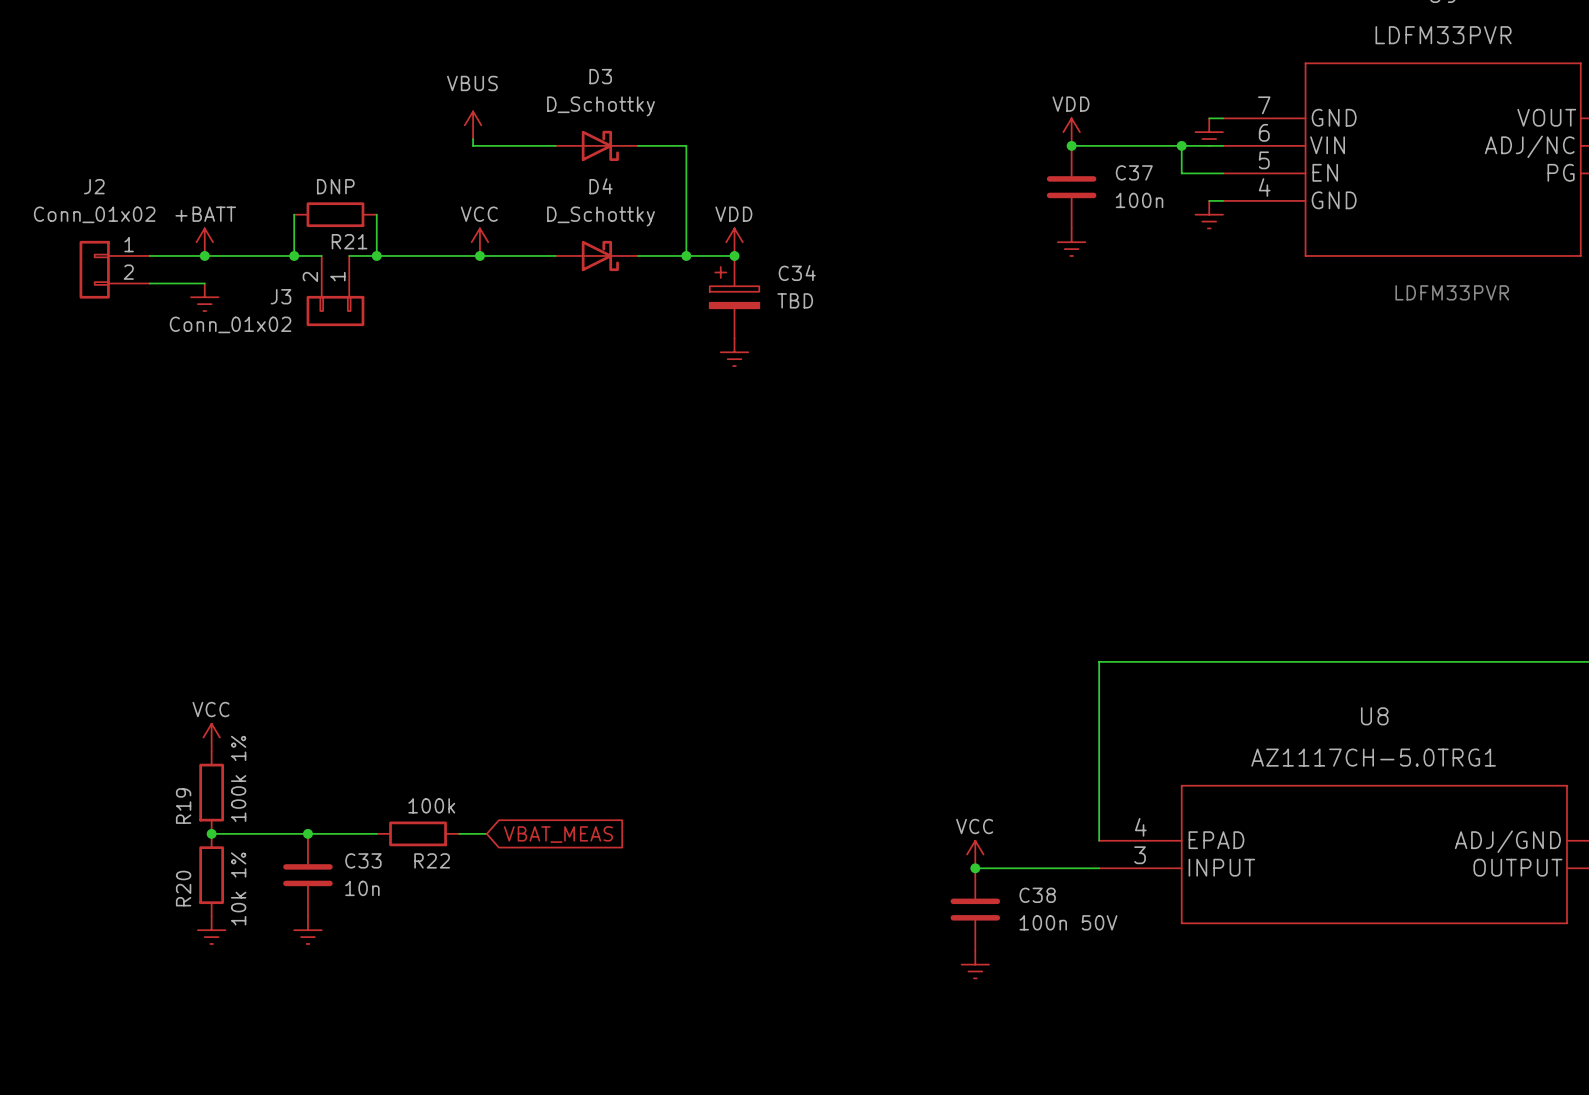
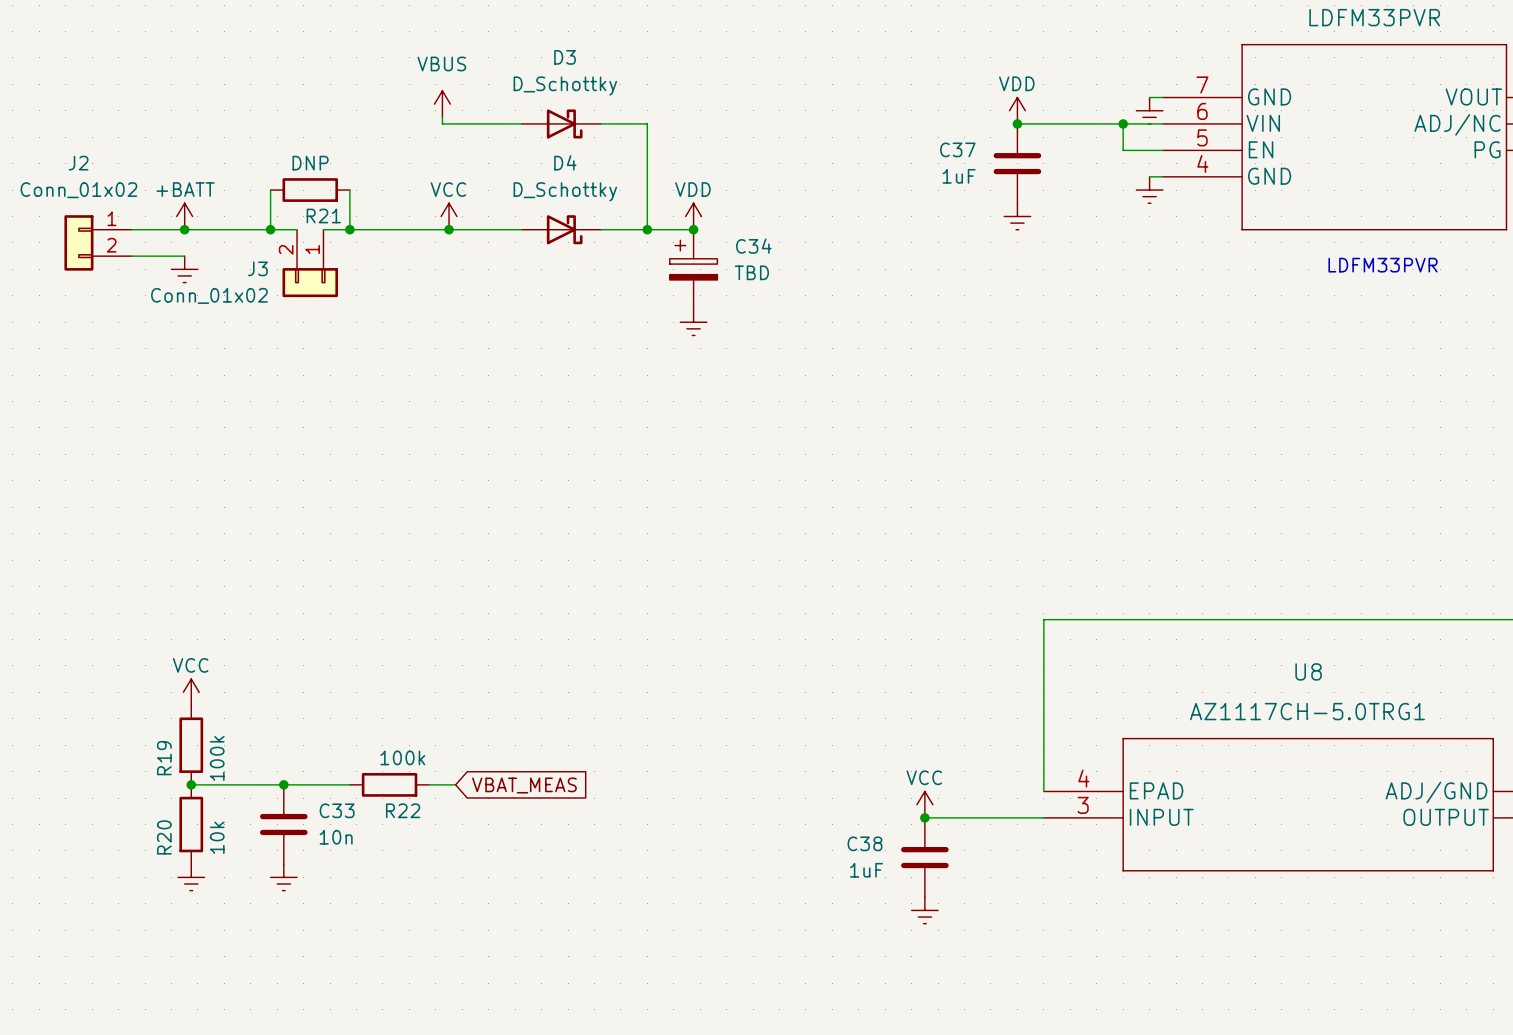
C37 name position: C37 (1134, 172) -> C37 (957, 149)
C37 value: 100n (1139, 200) -> 1uF (959, 176)
R19 value: 100k 1% (238, 778) -> 100k (217, 758)
R20 value: 10k 1% (238, 888) -> 10k (217, 837)
C38 name position: C38 (1037, 895) -> C38 (864, 843)
C38 value: 100n 50V (1068, 922) -> 1uF (866, 870)

